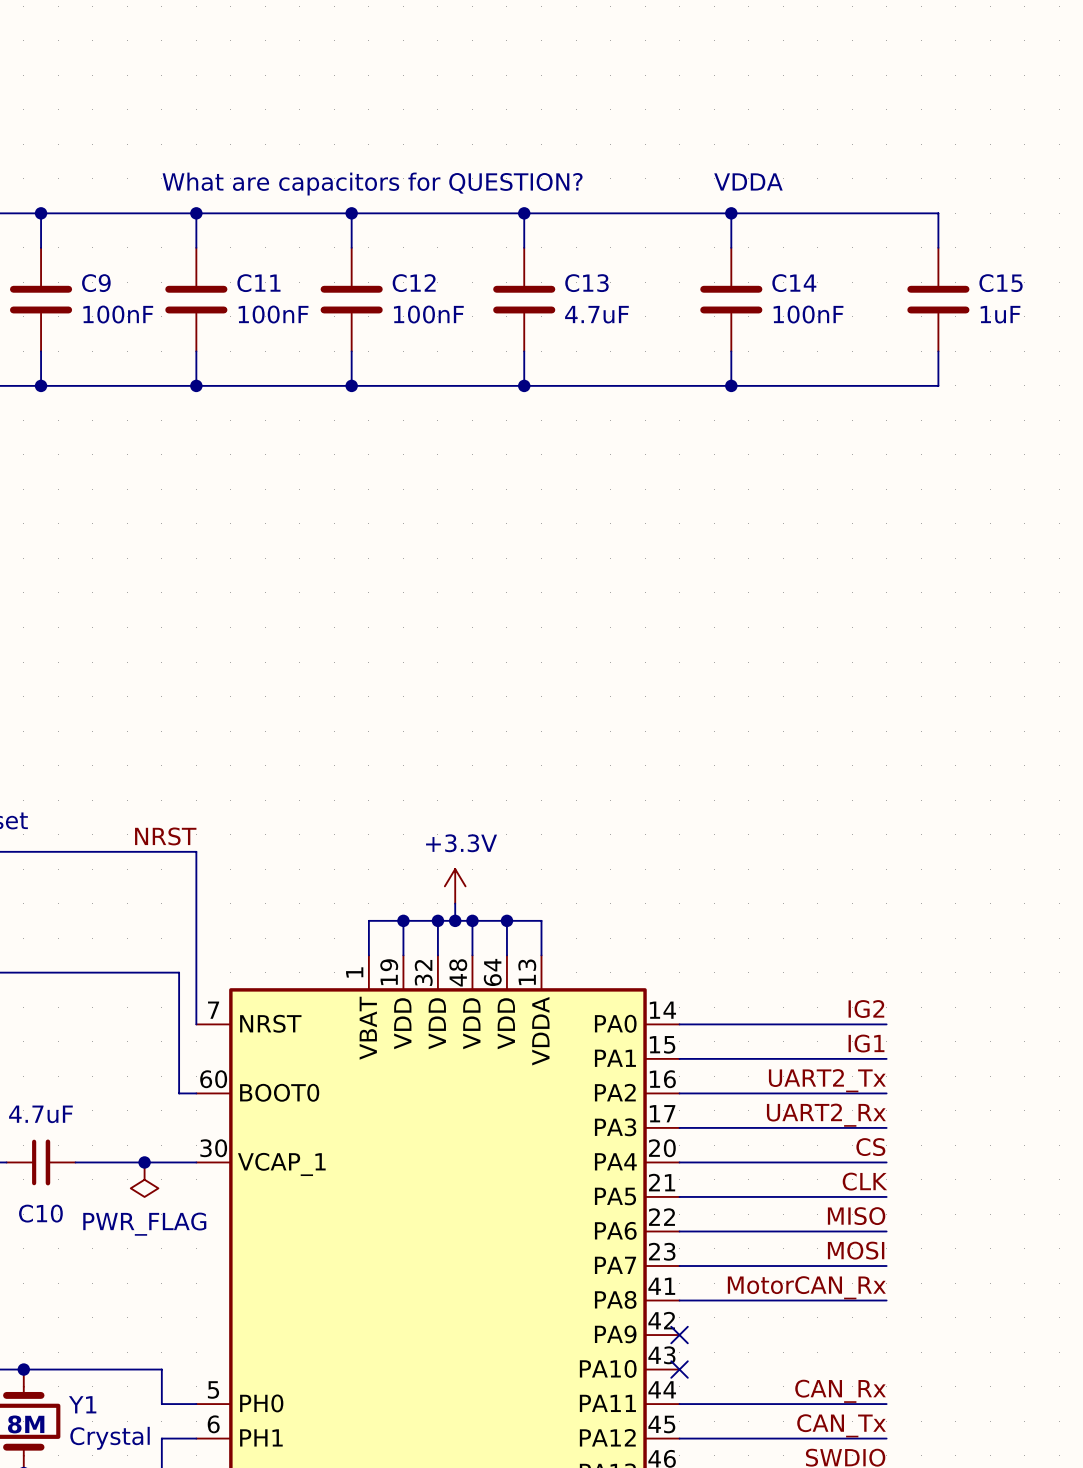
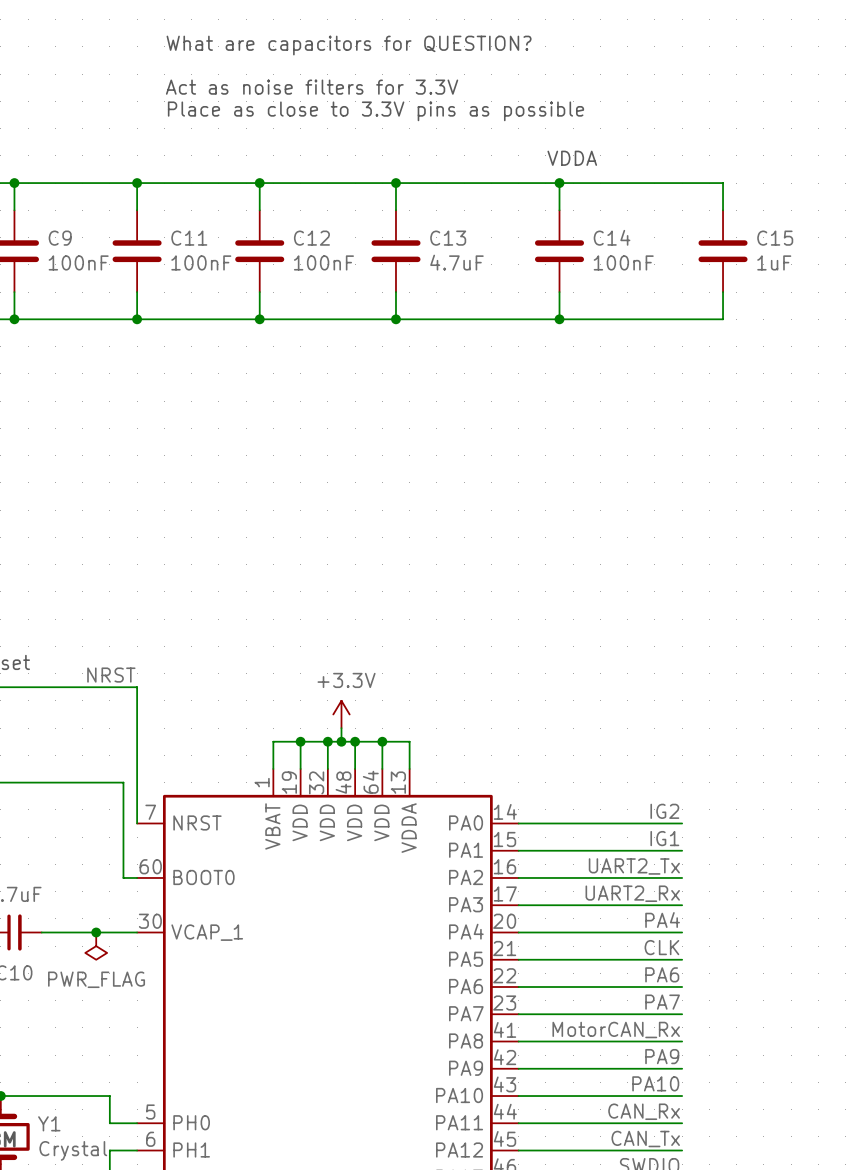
text: none -> Act as noise filters for 3.3V (312, 87)
text: none -> Place as close to 3.3V pins as possible (375, 111)
text position: What are capacitors for QUESTION? (372, 184) -> What are capacitors for QUESTION? (349, 45)
label: CS (870, 1147) -> PA4 (662, 920)
label: MISO (856, 1216) -> PA6 (662, 974)
label: MOSI (856, 1250) -> PA7 (662, 1002)
label: none -> PA9 (662, 1056)
wire: none -> (518, 1068) (682, 1068)
no-connect mark: (679, 1335) -> none
label: none -> PA10 (655, 1083)
wire: none -> (518, 1096) (682, 1096)
no-connect mark: (679, 1369) -> none

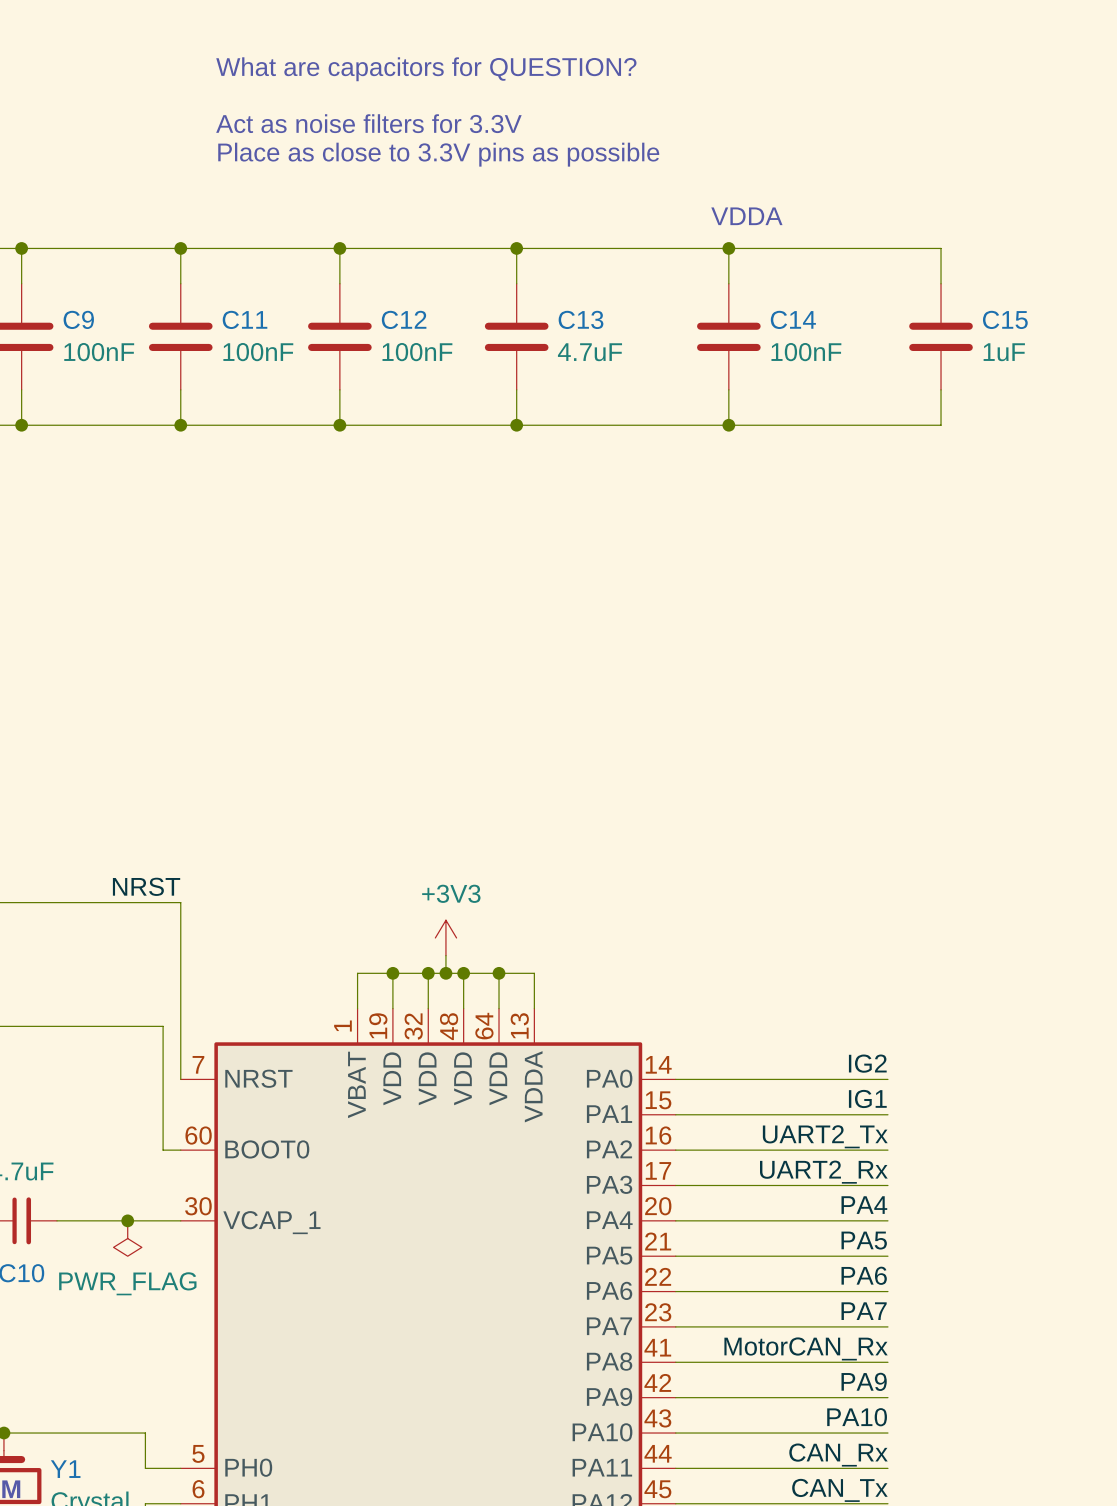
power symbol: +3.3V (341, 714) -> +3V3 (445, 937)
label: CLK (661, 947) -> PA5 (864, 1240)

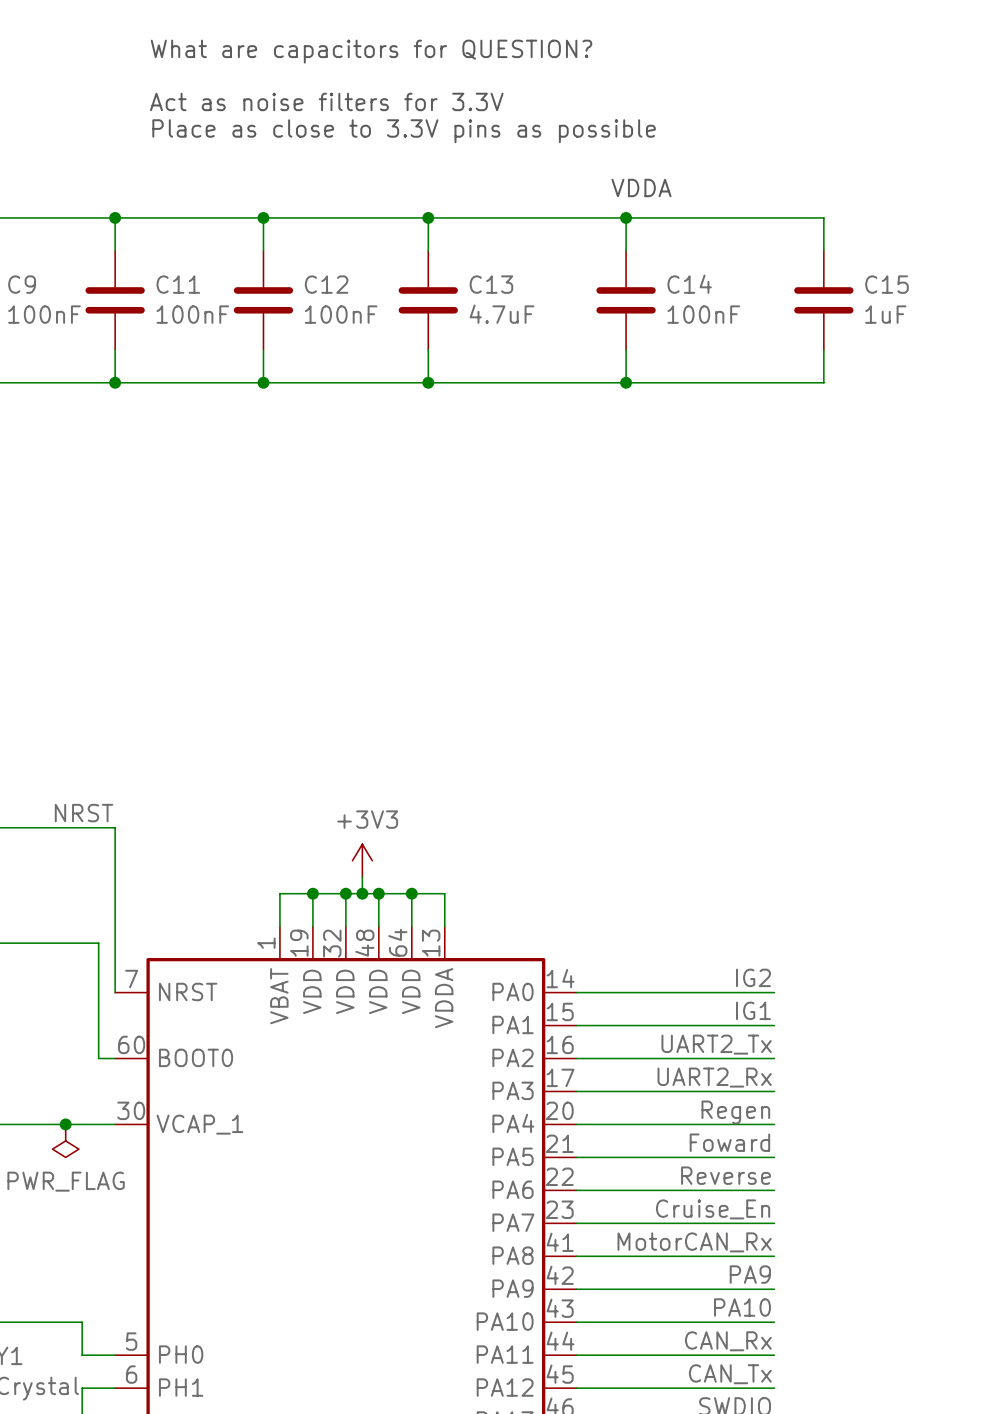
label: PA4 (864, 1205) -> Regen (735, 1112)
label: PA5 (864, 1240) -> Foward (729, 1142)
label: PA6 (864, 1275) -> Reverse (726, 1175)
label: PA7 (864, 1311) -> Cruise_En (713, 1209)

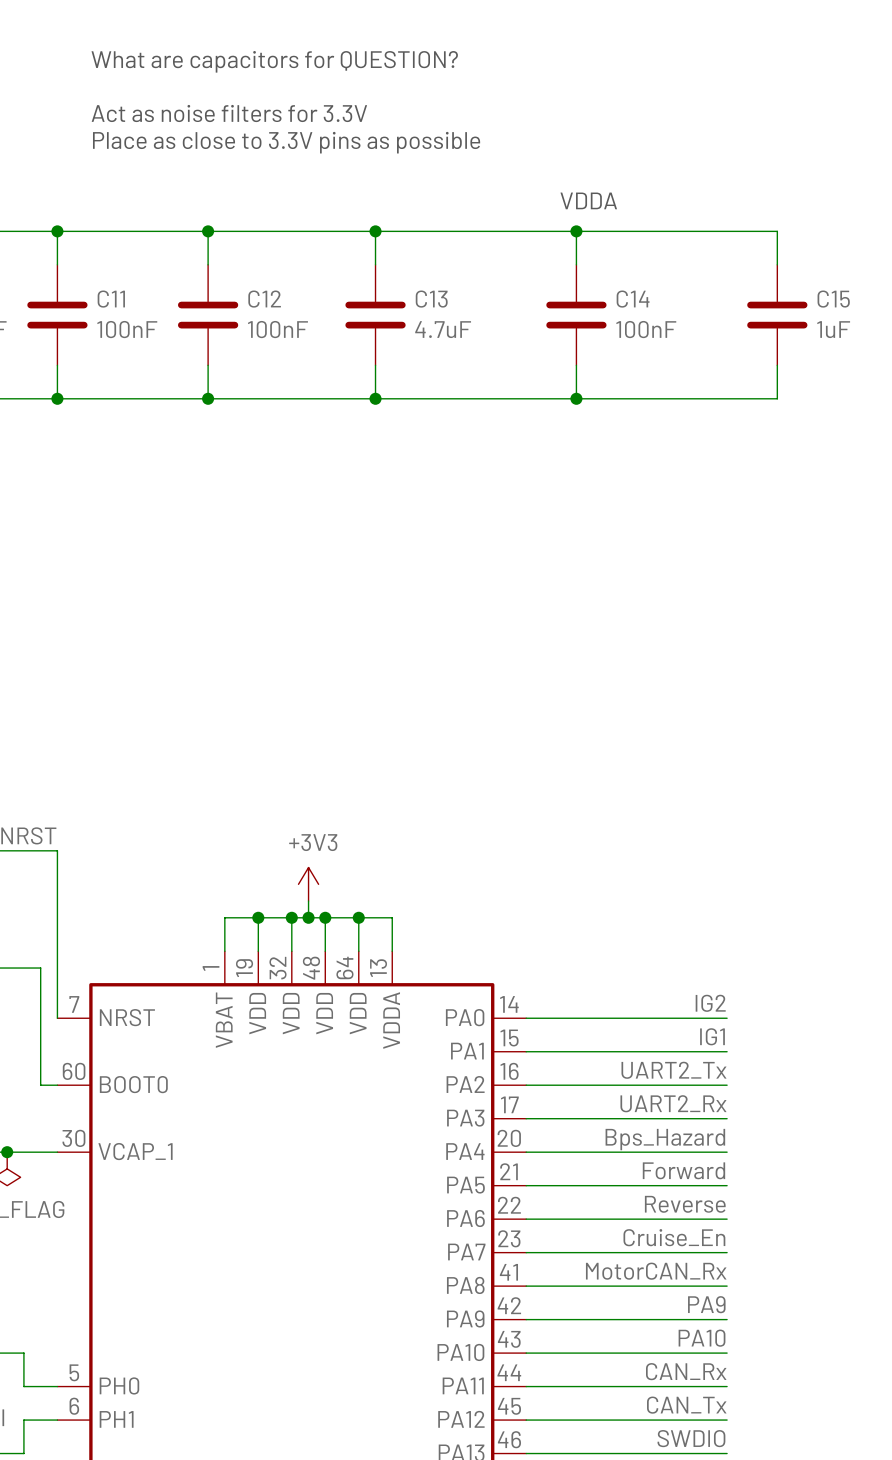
label: Regen (735, 1112) -> Bps_Hazard (665, 1139)
label: Foward (729, 1142) -> Forward (683, 1170)

